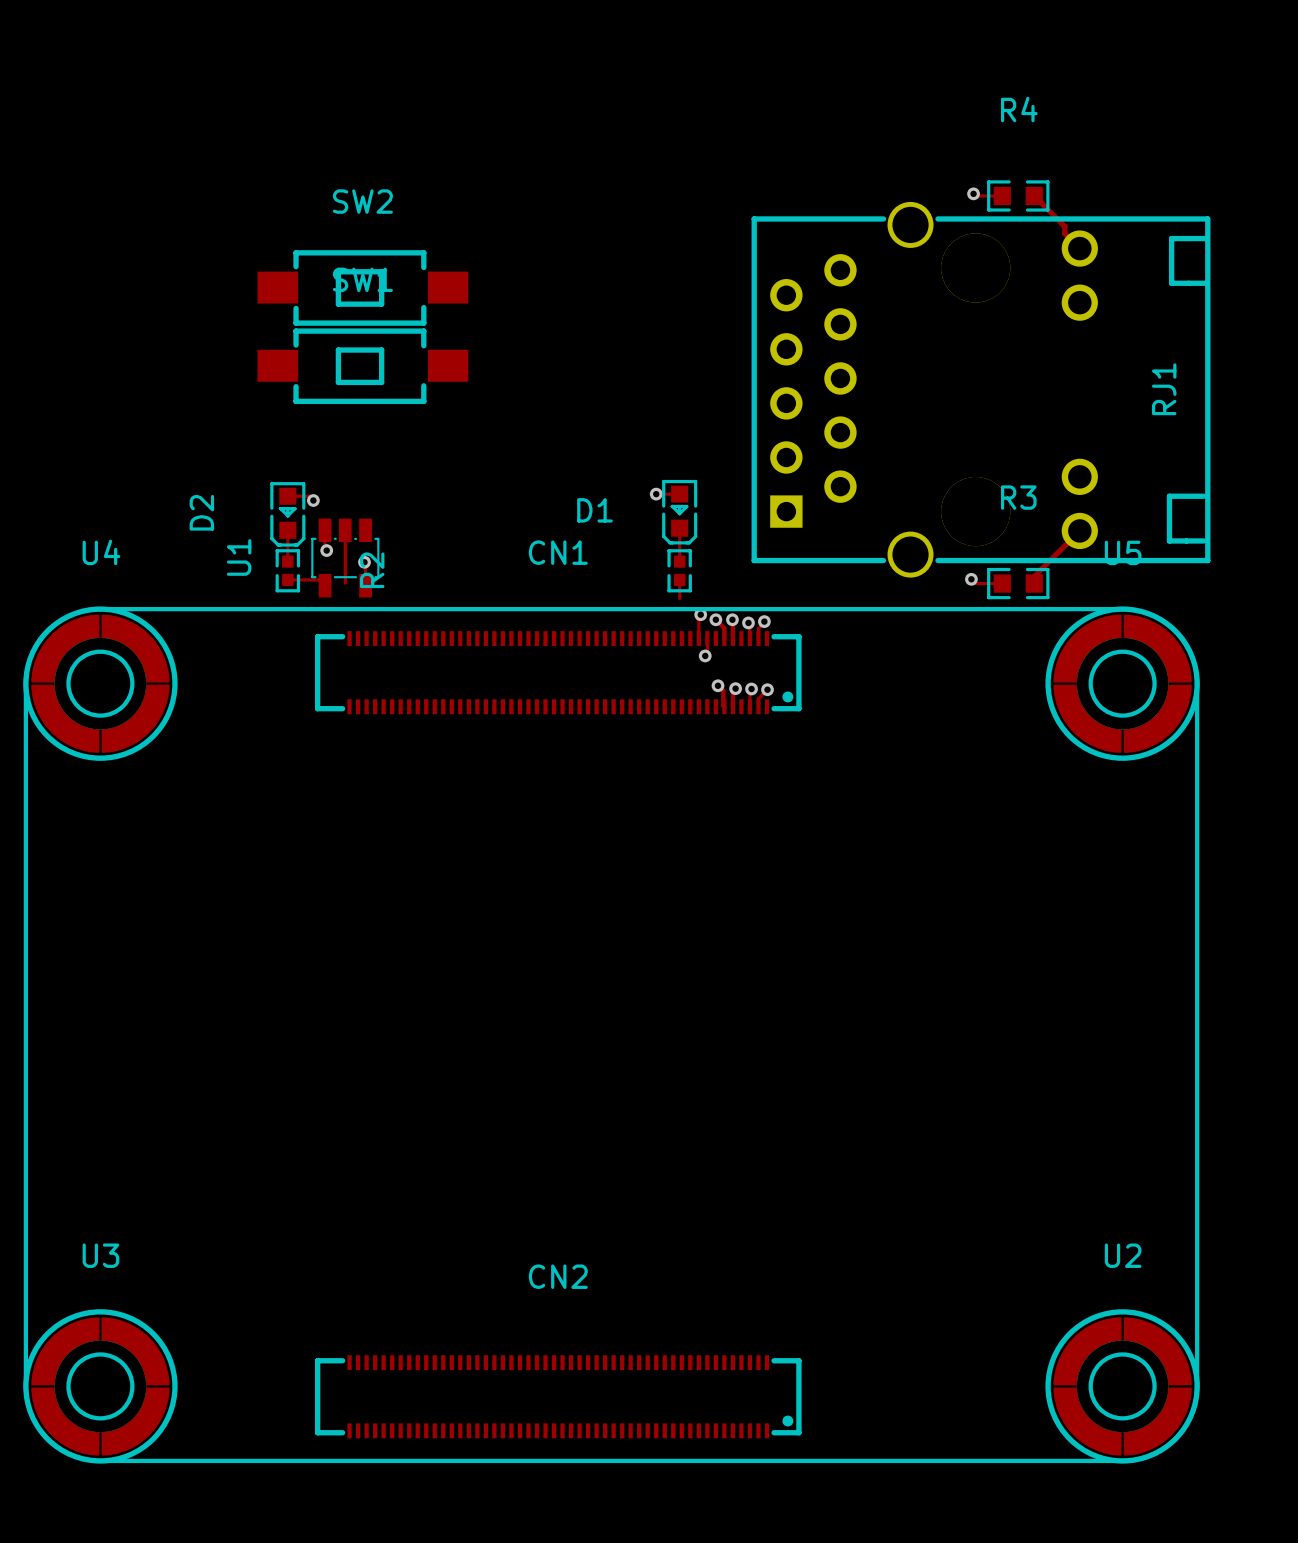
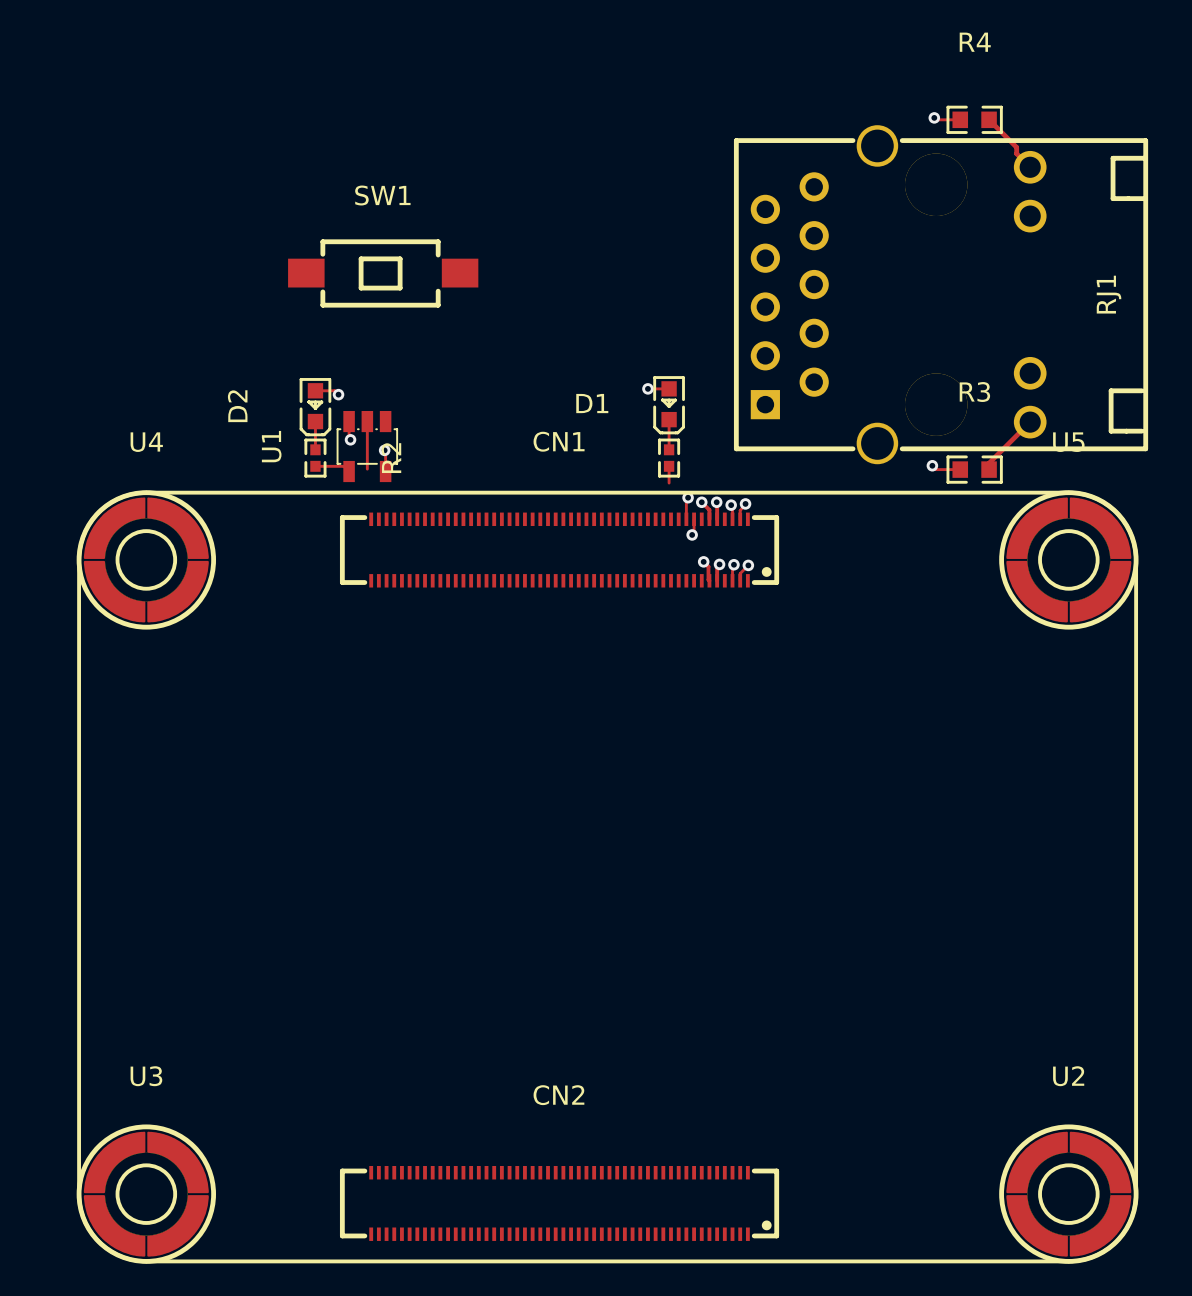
SW2: (362, 287) -> none

